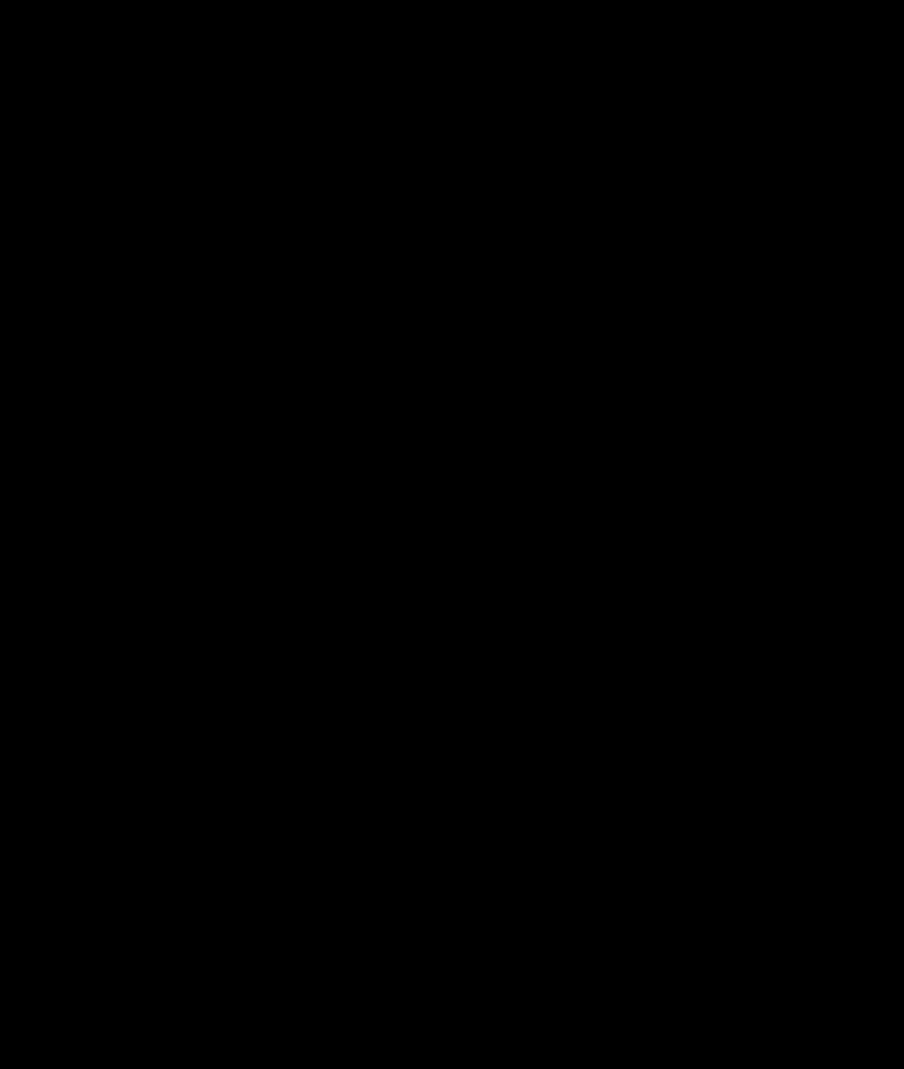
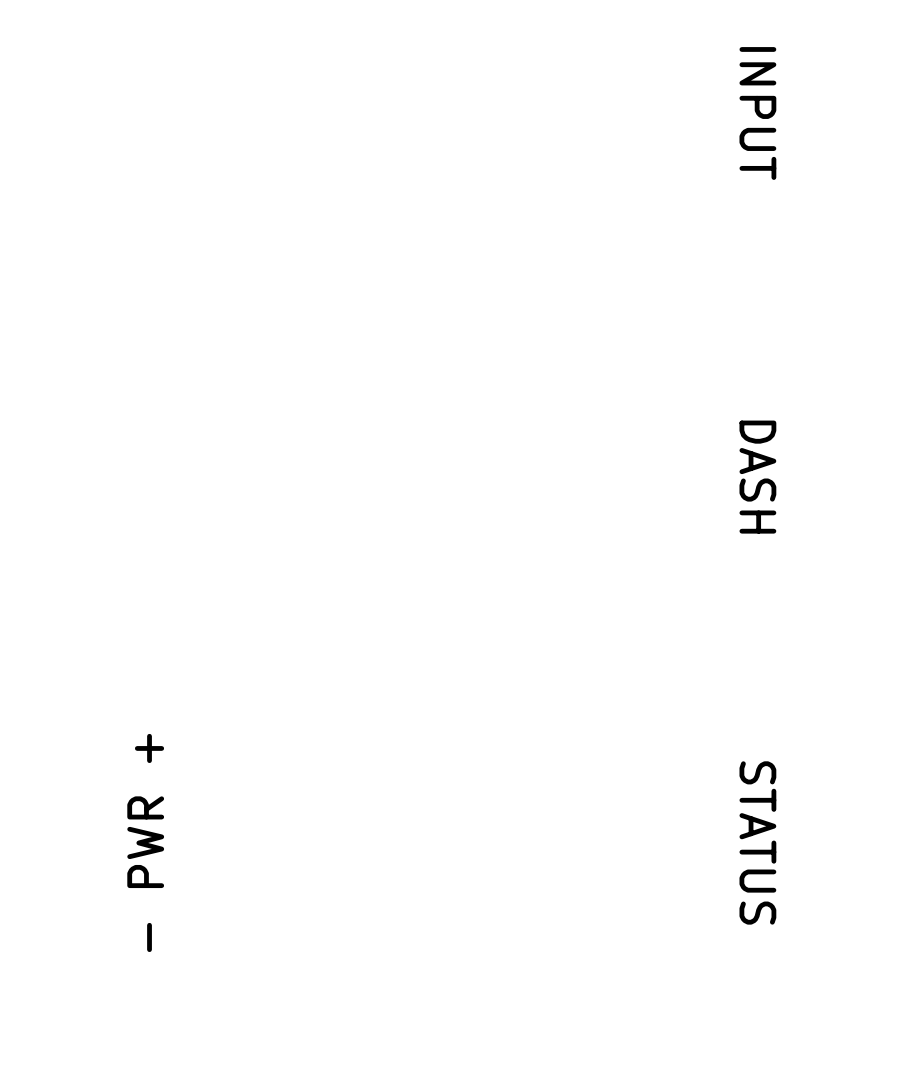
text: none -> INPUT (757, 113)
text: none -> DASH (757, 477)
text: none -> STATUS (757, 842)
text: none -> - PWR + (145, 842)

